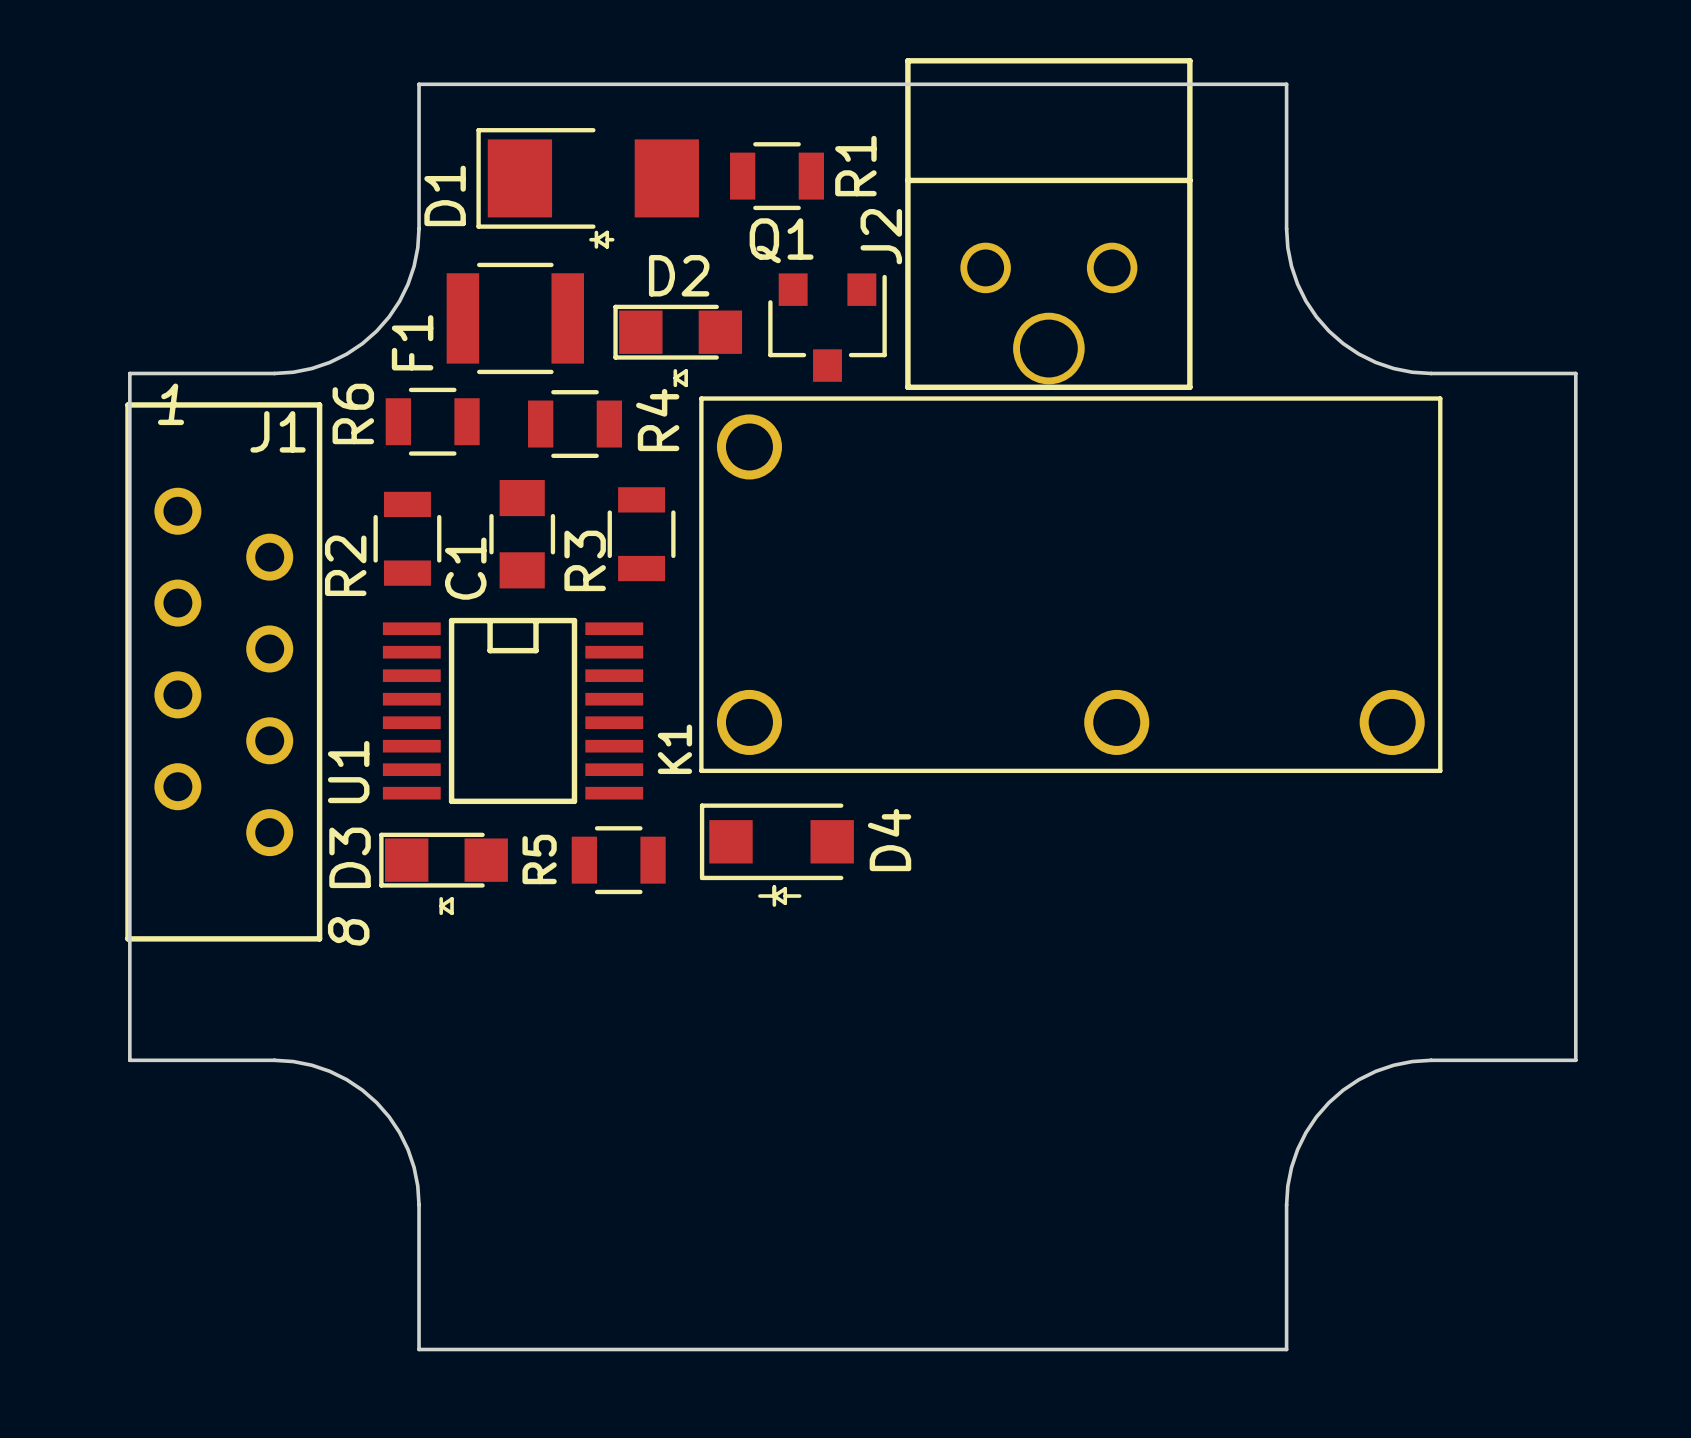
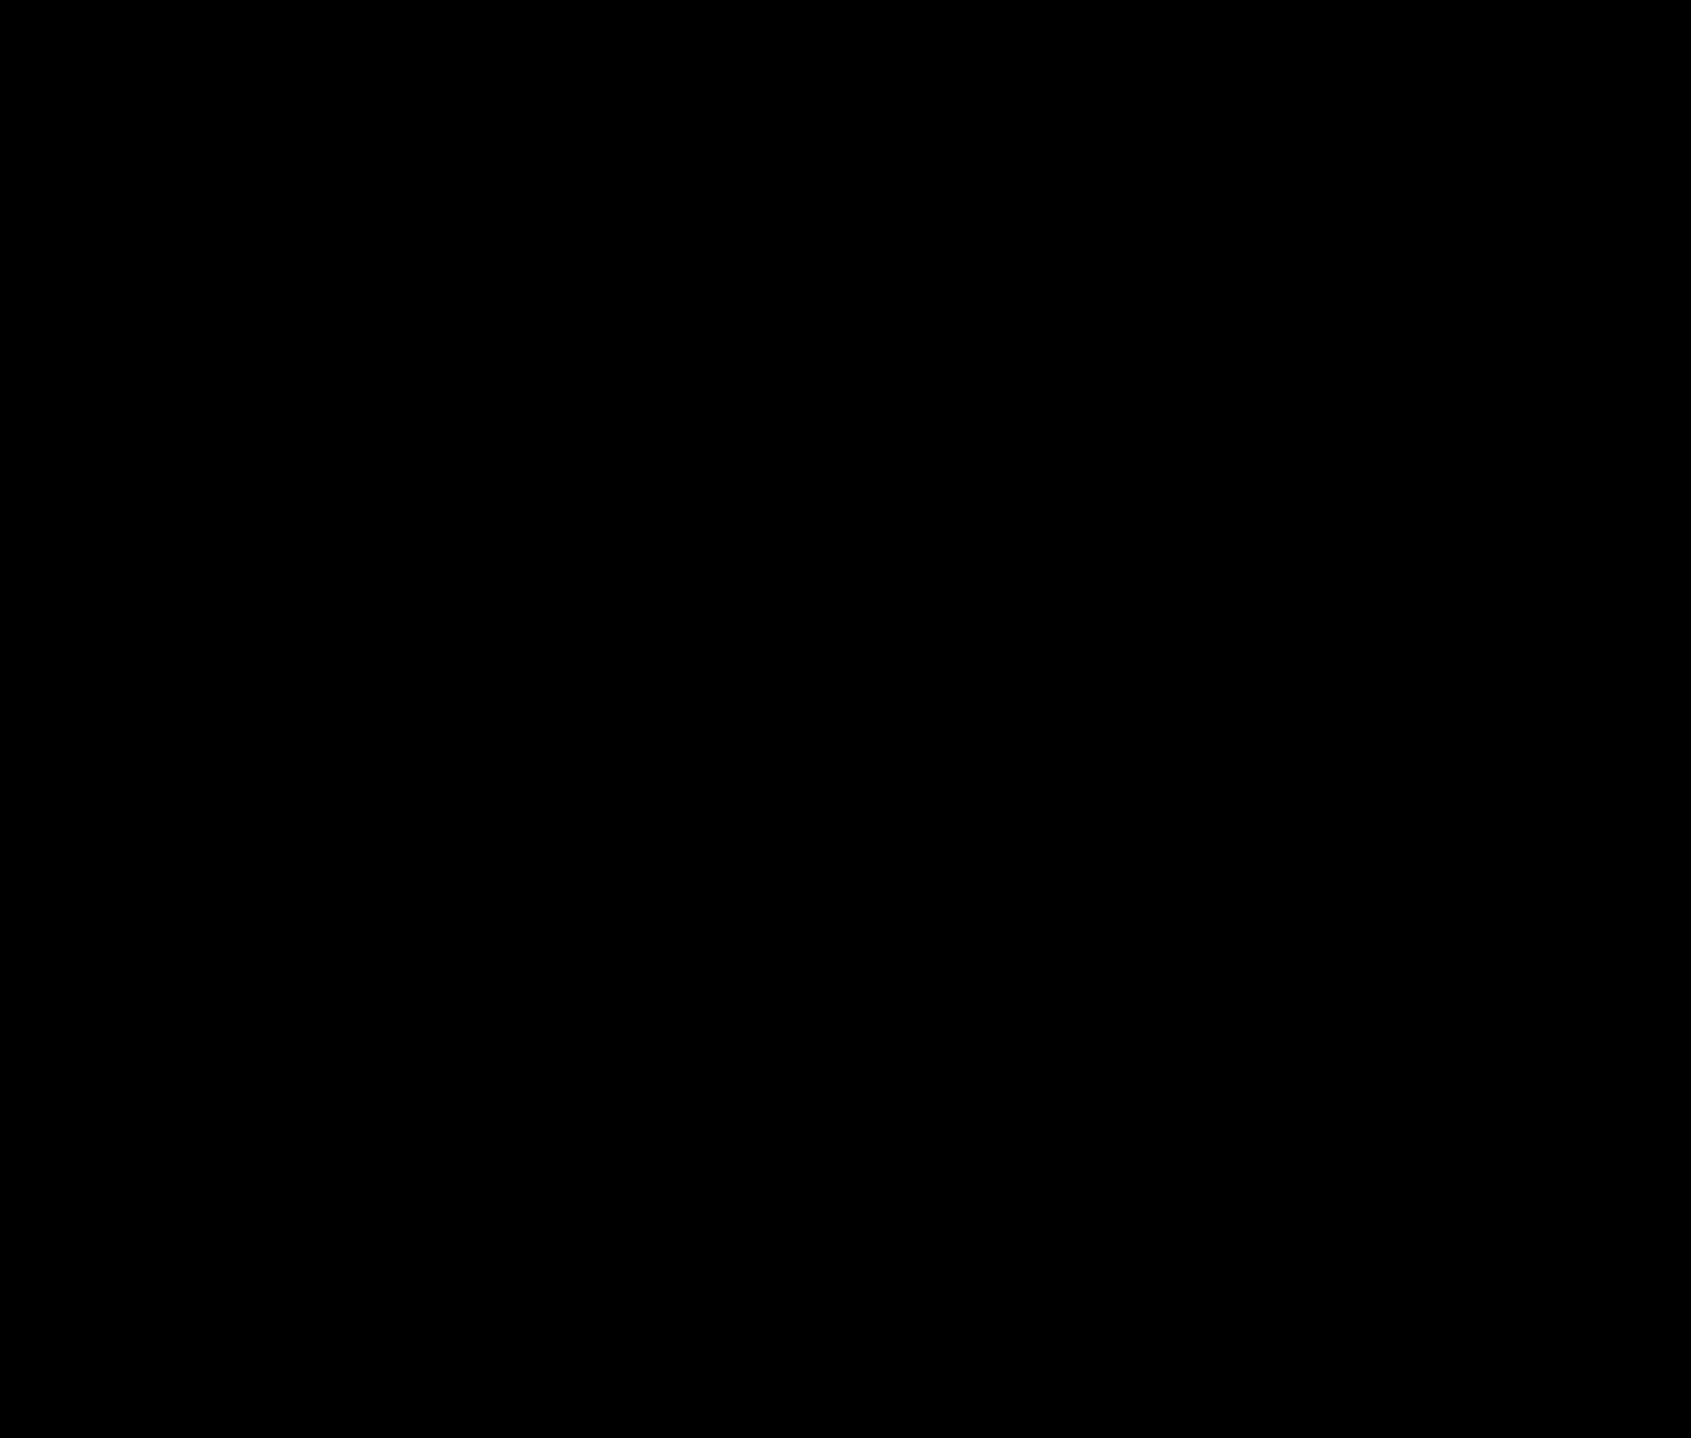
board edge: (419, 84) (417, 247) (408, 284) (399, 301) (376, 331) (362, 343) (329, 362) (293, 372) (129, 373) (129, 1060) (293, 1061) (329, 1071) (362, 1090) (376, 1102) (399, 1132) (408, 1149) (417, 1186) (419, 1349) (1286, 1349) (1287, 1186) (1297, 1149) (1305, 1132) (1328, 1102) (1343, 1090) (1375, 1071) (1412, 1061) (1575, 1060) (1575, 373) (1412, 372) (1375, 362) (1343, 343) (1328, 331) (1305, 301) (1297, 284) (1287, 247) (1286, 84) (419, 84) -> none
R1: (777, 176) -> none
D1: (587, 188) -> none
J2: (1048, 224) -> none
F1: (515, 318) -> none
Q1: (827, 327) -> none
D2: (677, 345) -> none
R6: (432, 421) -> none
R4: (575, 424) -> none
C1: (522, 534) -> none
R3: (641, 534) -> none
R2: (407, 538) -> none
K1: (1070, 584) -> none
J1: (223, 671) -> none
U1: (513, 710) -> none
D4: (776, 855) -> none
R5: (618, 860) -> none
D3: (443, 873) -> none

